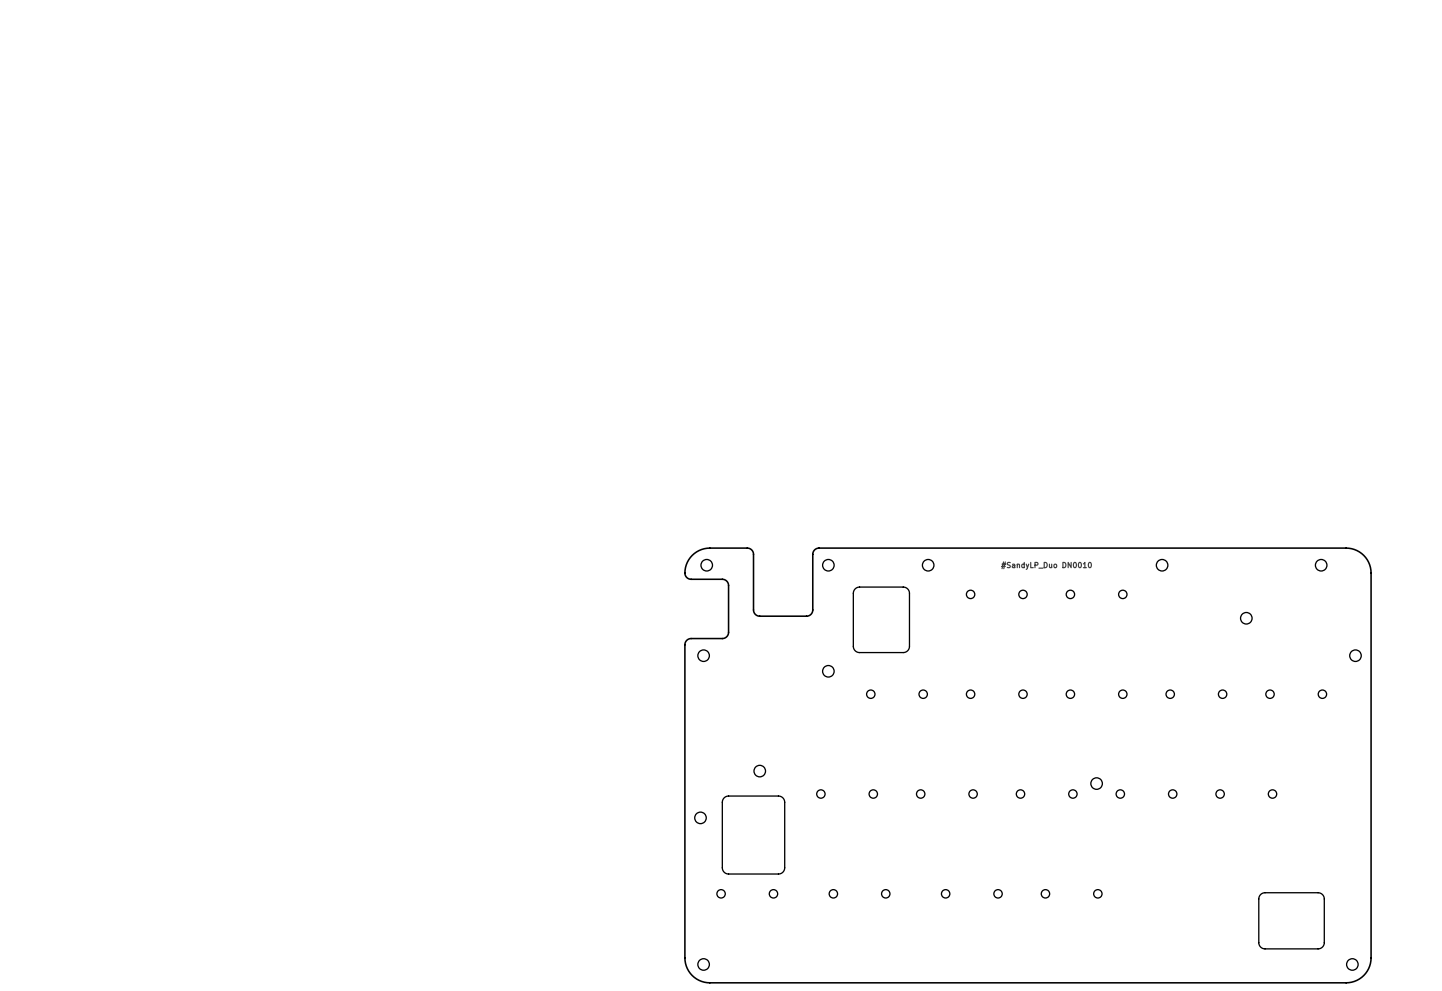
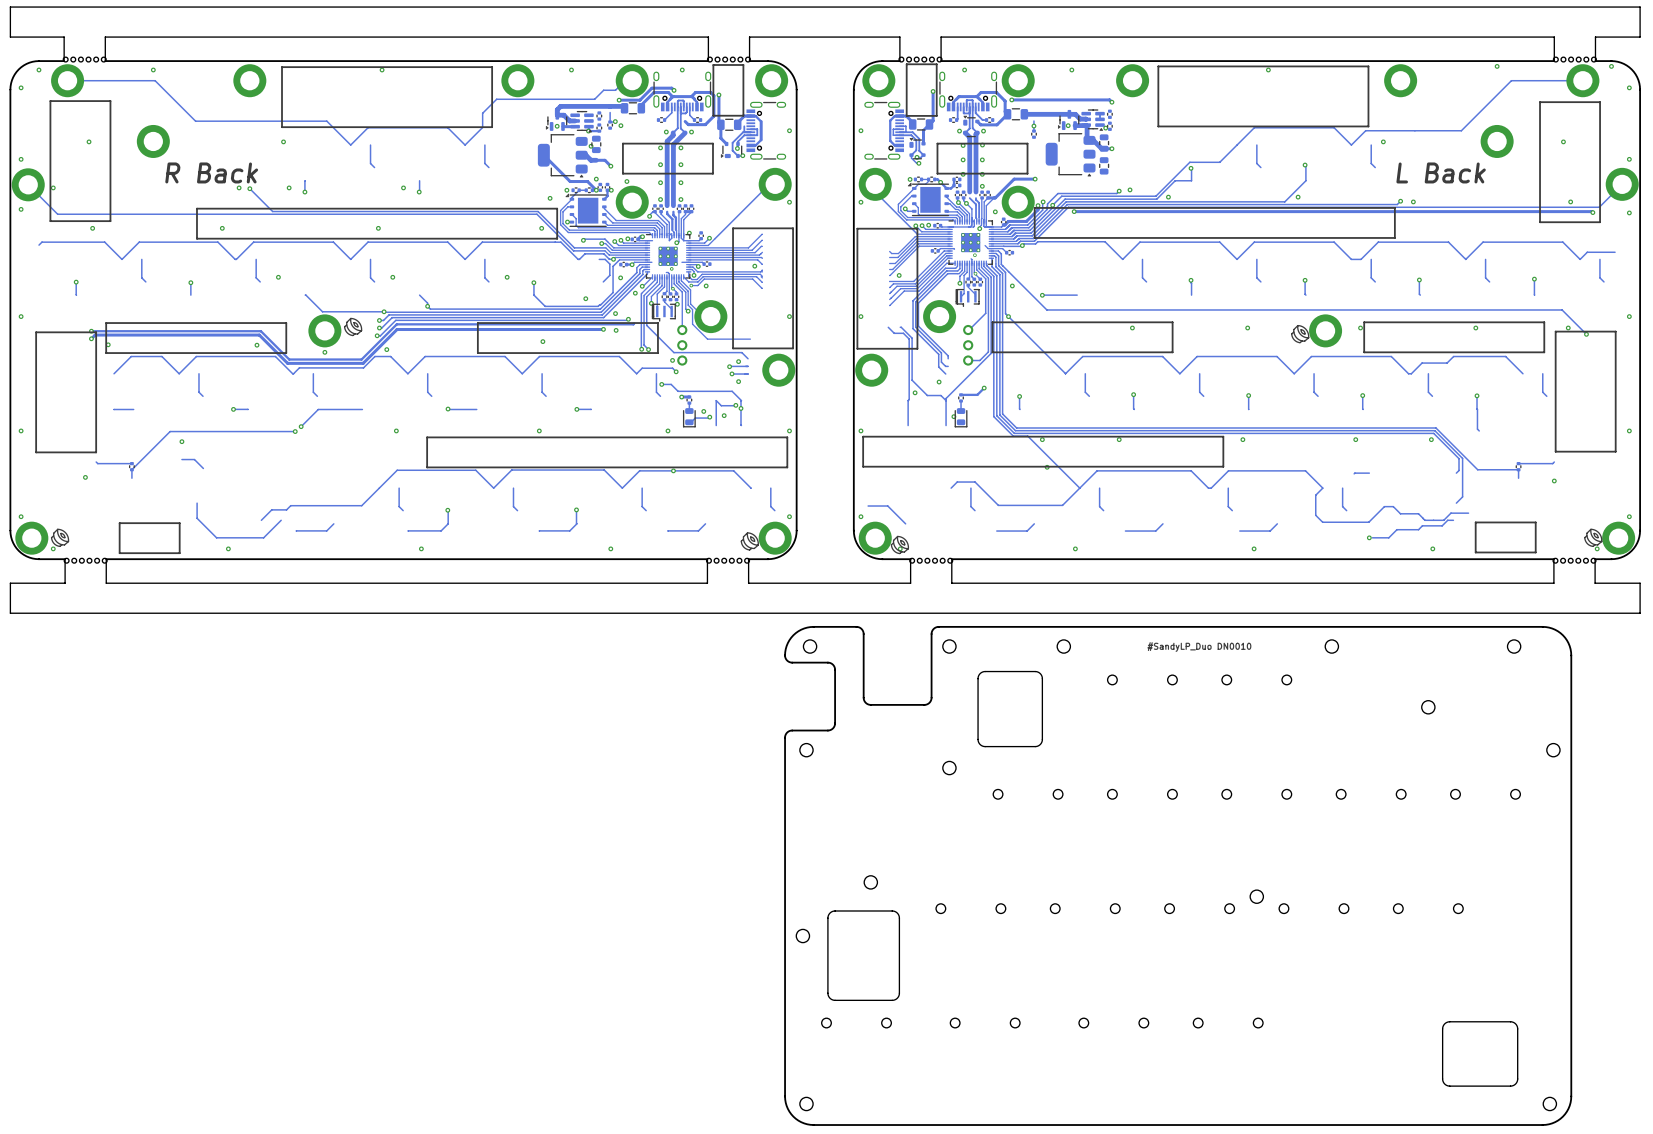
line: none -> (743, 64) (713, 64) (713, 115) (743, 115) (743, 64)
line: none -> (936, 64) (906, 64) (906, 115) (936, 115) (936, 64)
line: none -> (1368, 66) (1158, 66) (1158, 126) (1368, 126) (1368, 66)
via: none -> (1497, 66)
via: none -> (1611, 66)
line: none -> (492, 67) (282, 67) (282, 127) (492, 127) (492, 67)
via: none -> (38, 69)
via: none -> (153, 69)
via: none -> (382, 69)
via: none -> (571, 69)
via: none -> (682, 69)
via: none -> (964, 69)
via: none -> (1071, 69)
via: none -> (1268, 69)
part: none -> (67, 80)
part: none -> (249, 80)
part: none -> (517, 80)
track: none -> (632, 80) (625, 87) (603, 90) (594, 99) (496, 99) (482, 113) (482, 127) (465, 145) (447, 127) (367, 127) (350, 145) (326, 121) (195, 121) (155, 80) (67, 80)
part: none -> (632, 80)
part: none -> (771, 80)
part: none -> (878, 80)
part: none -> (1018, 80)
part: none -> (1132, 80)
part: none -> (1400, 80)
track: none -> (1582, 80) (1511, 80) (1461, 130) (1365, 130) (1351, 145) (1334, 127) (1254, 127) (1219, 162) (1189, 162) (1155, 196) (1061, 196) (1029, 230) (1013, 230) (1010, 234)
part: none -> (1582, 80)
via: none -> (21, 87)
via: none -> (1629, 87)
track: none -> (674, 90) (671, 88) (651, 88) (639, 100) (619, 100)
via: none -> (674, 90)
part: none -> (682, 91)
track: none -> (933, 91) (933, 120) (923, 130) (923, 143)
via: none -> (933, 91)
part: none -> (968, 91)
track: none -> (718, 94) (720, 138) (726, 143)
via: none -> (718, 94)
track: none -> (672, 96) (667, 102) (667, 106)
track: none -> (691, 96) (695, 92) (710, 92) (713, 95) (713, 116) (705, 124) (688, 124) (685, 121)
track: none -> (976, 96) (959, 96) (953, 102) (953, 106)
track: none -> (976, 96) (981, 92) (996, 92) (1005, 101) (1005, 111) (1007, 114) (996, 124) (980, 124) (977, 121)
track: none -> (976, 96) (982, 102) (982, 106)
via: none -> (619, 100)
track: none -> (1011, 99) (1109, 99) (1111, 102)
via: none -> (1011, 99)
line: none -> (110, 101) (50, 101) (50, 221) (110, 221) (110, 101)
via: none -> (1111, 102)
line: none -> (1600, 102) (1540, 102) (1540, 222) (1600, 222) (1600, 102)
track: none -> (671, 106) (671, 112) (664, 120)
track: none -> (680, 106) (680, 128) (685, 132) (673, 144) (673, 205)
track: none -> (683, 106) (683, 101) (678, 100) (677, 128) (667, 141) (667, 205)
track: none -> (686, 106) (686, 112) (680, 113)
track: none -> (689, 106) (689, 115) (694, 120)
track: none -> (696, 106) (696, 102) (692, 96) (672, 96) (668, 92) (653, 92) (641, 105) (641, 108)
track: none -> (957, 106) (956, 120)
track: none -> (963, 106) (963, 113) (969, 113)
track: none -> (966, 106) (966, 100) (972, 100) (972, 128) (977, 132) (975, 192)
track: none -> (969, 106) (969, 128) (965, 132)
track: none -> (975, 106) (975, 113) (982, 120) (986, 120)
track: none -> (624, 108) (622, 106) (560, 106) (557, 109) (557, 115) (563, 115) (569, 120) (575, 120)
part: none -> (632, 108)
track: none -> (610, 112) (610, 122) (615, 121)
part: none -> (1015, 114)
track: none -> (1024, 114) (1075, 114) (1080, 119) (1086, 119)
track: none -> (1100, 113) (1100, 119)
part: none -> (1109, 114)
part: none -> (599, 116)
part: none -> (661, 120)
part: none -> (697, 120)
part: none -> (953, 120)
part: none -> (989, 120)
part: none -> (1068, 119)
part: none -> (1093, 120)
part: none -> (556, 120)
track: none -> (1033, 121) (1033, 126)
part: none -> (582, 121)
via: none -> (615, 121)
part: none -> (729, 124)
track: none -> (737, 124) (744, 116) (755, 116) (761, 121) (761, 139) (755, 145) (750, 145)
track: none -> (912, 124) (906, 116) (894, 116) (890, 120) (890, 140) (894, 145) (899, 145)
part: none -> (921, 124)
part: none -> (610, 125)
via: none -> (620, 125)
via: none -> (1068, 125)
track: none -> (1075, 125) (1086, 125) (1087, 137) (1089, 140) (1093, 140) (1101, 148) (1111, 148)
via: none -> (557, 126)
track: none -> (563, 126) (575, 126)
track: none -> (588, 126) (588, 131) (599, 131)
track: none -> (744, 126) (744, 132)
track: none -> (899, 126) (905, 126) (905, 132) (905, 132) (899, 132) (912, 132) (919, 138) (919, 150) (923, 155) (917, 157)
part: none -> (971, 126)
track: none -> (1033, 126) (1033, 131)
via: none -> (1033, 126)
part: none -> (1109, 126)
part: none -> (599, 128)
via: none -> (1105, 128)
track: none -> (750, 129) (757, 129) (757, 135)
track: none -> (899, 129) (893, 129) (893, 135) (911, 135) (916, 140) (916, 150) (911, 155) (911, 158) (918, 163)
via: none -> (588, 131)
part: none -> (766, 130)
via: none -> (789, 130)
via: none -> (860, 130)
part: none -> (884, 130)
via: none -> (959, 131)
via: none -> (983, 131)
via: none -> (666, 132)
via: none -> (691, 132)
track: none -> (750, 132) (743, 132) (732, 142) (732, 150) (737, 156) (742, 155)
track: none -> (965, 132) (969, 137) (969, 192)
part: none -> (1033, 134)
track: none -> (757, 135) (744, 135) (737, 141) (737, 148)
via: none -> (89, 141)
part: none -> (153, 141)
via: none -> (283, 141)
via: none -> (1383, 141)
part: none -> (1497, 141)
via: none -> (1563, 141)
part: none -> (1104, 143)
line: none -> (712, 143) (622, 143) (622, 173) (712, 173) (712, 143)
line: none -> (1027, 143) (937, 143) (937, 173) (1027, 173) (1027, 143)
track: none -> (370, 145) (370, 163) (374, 167)
track: none -> (484, 145) (484, 163) (488, 167)
part: none -> (596, 144)
via: none -> (963, 145)
via: none -> (982, 145)
track: none -> (1256, 145) (1256, 163) (1260, 167)
track: none -> (1371, 145) (1371, 163) (1375, 167)
via: none -> (591, 146)
via: none -> (660, 147)
via: none -> (680, 147)
via: none -> (737, 148)
part: none -> (917, 148)
via: none -> (1111, 148)
part: none -> (731, 150)
track: none -> (543, 155) (570, 181) (587, 181) (596, 190)
track: none -> (581, 155) (585, 155) (590, 160) (604, 160) (610, 166)
via: none -> (742, 155)
part: none -> (1070, 154)
part: none -> (562, 155)
via: none -> (917, 157)
via: none -> (21, 159)
via: none -> (963, 159)
via: none -> (982, 159)
via: none -> (1629, 159)
via: none -> (918, 163)
via: none -> (660, 164)
via: none -> (680, 164)
part: none -> (1104, 165)
track: none -> (1305, 165) (1305, 180) (1284, 201) (1066, 201) (1032, 235) (1016, 235) (1014, 238)
via: none -> (1305, 165)
via: none -> (610, 166)
track: none -> (1191, 168) (1191, 180) (1175, 180) (1156, 199) (1065, 199) (1031, 233) (1015, 233) (1012, 236)
via: none -> (1191, 168)
text: none -> R Back (211, 172)
text: none -> L Back (1441, 172)
via: none -> (963, 174)
via: none -> (982, 174)
via: none -> (596, 179)
via: none -> (910, 179)
part: none -> (918, 179)
track: none -> (921, 179) (928, 179) (928, 181) (925, 184) (918, 184) (898, 204) (898, 211) (906, 219) (953, 219) (955, 221)
part: none -> (931, 179)
track: none -> (954, 179) (954, 185) (951, 188) (946, 188) (937, 179) (934, 179)
part: none -> (956, 179)
track: none -> (1035, 179) (1014, 179) (995, 197) (988, 197) (984, 201) (983, 226) (1001, 226) (1008, 221) (1026, 221) (1038, 209) (1038, 205)
via: none -> (1035, 179)
track: none -> (305, 180) (304, 192)
track: none -> (419, 180) (419, 192)
via: none -> (626, 181)
via: none -> (660, 182)
via: none -> (680, 182)
via: none -> (940, 182)
track: none -> (775, 184) (769, 184) (708, 245) (688, 245)
part: none -> (775, 184)
track: none -> (875, 184) (875, 192) (917, 234) (950, 234)
part: none -> (875, 184)
track: none -> (1622, 184) (1599, 207) (1068, 207) (1034, 241) (1020, 241) (1018, 243)
part: none -> (1622, 184)
track: none -> (28, 184) (57, 214) (536, 214) (573, 250) (605, 250) (609, 255) (647, 255)
part: none -> (28, 184)
part: none -> (956, 185)
via: none -> (982, 186)
part: none -> (600, 187)
part: none -> (607, 187)
via: none -> (53, 187)
via: none -> (239, 187)
track: none -> (249, 188) (272, 211) (538, 211) (574, 247) (605, 247) (610, 252) (647, 252)
via: none -> (249, 188)
via: none -> (289, 187)
via: none -> (403, 187)
via: none -> (1130, 189)
via: none -> (566, 190)
part: none -> (576, 190)
track: none -> (586, 190) (579, 190) (560, 210) (560, 224) (568, 232) (649, 232) (652, 235)
part: none -> (589, 190)
via: none -> (596, 190)
track: none -> (611, 190) (607, 190) (607, 196) (604, 199)
via: none -> (611, 190)
track: none -> (1119, 191) (1116, 193) (1057, 193) (1047, 204) (1047, 209) (1028, 227) (1011, 227) (1007, 231)
via: none -> (1119, 191)
via: none -> (304, 192)
via: none -> (419, 192)
part: none -> (957, 195)
part: none -> (963, 195)
part: none -> (982, 195)
part: none -> (988, 195)
track: none -> (914, 196) (911, 196) (900, 207) (900, 210) (907, 217) (956, 217) (957, 221)
track: none -> (946, 196) (967, 214) (967, 221)
track: none -> (957, 197) (957, 201) (969, 213) (969, 221)
track: none -> (963, 197) (963, 200) (971, 208) (971, 225) (970, 226)
track: none -> (969, 198) (976, 204) (976, 221)
track: none -> (975, 198) (979, 202) (979, 221)
track: none -> (982, 197) (981, 225) (979, 227)
track: none -> (994, 197) (986, 205) (986, 226)
via: none -> (1168, 197)
via: none -> (1298, 197)
via: none -> (550, 198)
part: none -> (928, 199)
via: none -> (660, 199)
via: none -> (680, 199)
track: none -> (1400, 201) (1397, 204) (1067, 204) (1033, 238) (1019, 238) (1016, 241) (991, 241)
via: none -> (1400, 201)
part: none -> (632, 202)
via: none -> (789, 202)
via: none -> (860, 202)
via: none -> (958, 202)
part: none -> (1018, 202)
track: none -> (1043, 201) (1042, 210) (1027, 225) (1009, 225) (1005, 228)
via: none -> (1043, 201)
via: none -> (1413, 201)
via: none -> (1570, 201)
track: none -> (914, 203) (918, 207) (919, 215) (957, 215) (959, 217) (959, 221)
track: none -> (946, 203) (949, 203) (964, 215) (964, 221)
via: none -> (966, 203)
via: none -> (1038, 205)
via: none -> (1052, 205)
track: none -> (571, 206) (567, 206) (563, 211) (563, 223) (569, 230) (653, 230) (654, 235)
track: none -> (604, 206) (616, 220) (658, 220) (664, 226) (664, 235)
line: none -> (1394, 207) (1034, 207) (1034, 237) (1394, 237) (1394, 207)
via: none -> (21, 209)
line: none -> (557, 208) (196, 208) (196, 238) (557, 238) (557, 208)
part: none -> (654, 208)
part: none -> (661, 208)
part: none -> (679, 208)
part: none -> (685, 208)
part: none -> (691, 208)
track: none -> (905, 208) (907, 211) (914, 211)
via: none -> (905, 208)
part: none -> (586, 210)
track: none -> (661, 211) (661, 214) (669, 222) (669, 240) (671, 238) (671, 235) (669, 233) (669, 233)
track: none -> (667, 211) (672, 219) (674, 235)
track: none -> (673, 211) (675, 217) (676, 235)
track: none -> (679, 211) (678, 242)
track: none -> (946, 211) (957, 211) (962, 216) (962, 221)
via: none -> (995, 211)
track: none -> (1074, 211) (1592, 212)
via: none -> (1074, 211)
via: none -> (1592, 212)
via: none -> (1629, 212)
track: none -> (571, 214) (576, 218) (576, 225) (578, 227) (654, 227) (657, 230) (657, 235)
track: none -> (604, 214) (612, 222) (657, 222) (662, 227) (662, 234)
track: none -> (649, 216) (654, 211) (666, 224) (666, 235)
via: none -> (649, 216)
track: none -> (971, 219) (974, 221) (973, 226) (940, 225)
via: none -> (567, 222)
track: none -> (604, 222) (607, 225) (655, 225) (659, 229) (659, 234)
part: none -> (1003, 222)
track: none -> (922, 225) (925, 229) (950, 229)
via: none -> (922, 225)
via: none -> (928, 225)
part: none -> (937, 225)
track: none -> (915, 225) (921, 231) (950, 231)
via: none -> (915, 225)
track: none -> (1007, 227) (1005, 229) (991, 229)
via: none -> (92, 228)
via: none -> (222, 228)
via: none -> (378, 228)
via: none -> (541, 228)
line: none -> (793, 228) (733, 228) (733, 348) (793, 348) (793, 228)
line: none -> (917, 228) (857, 228) (857, 348) (917, 348) (917, 228)
via: none -> (979, 228)
track: none -> (1009, 229) (1007, 231) (991, 231)
track: none -> (1012, 232) (1010, 234) (991, 234)
via: none -> (689, 233)
track: none -> (762, 234) (748, 247) (688, 247)
track: none -> (1013, 234) (1012, 236) (991, 236)
part: none -> (701, 235)
track: none -> (642, 236) (637, 239) (652, 240)
via: none -> (642, 236)
track: none -> (950, 236) (915, 236) (898, 253) (891, 253) (889, 251)
track: none -> (1016, 236) (1013, 239) (991, 239)
track: none -> (709, 238) (704, 243) (688, 243)
via: none -> (709, 238)
via: none -> (627, 238)
part: none -> (635, 239)
track: none -> (701, 238) (699, 240) (683, 240)
track: none -> (950, 239) (916, 239) (897, 257) (889, 257)
track: none -> (583, 240) (605, 239) (613, 247) (647, 247)
via: none -> (583, 240)
track: none -> (620, 240) (623, 243) (647, 243)
via: none -> (620, 240)
track: none -> (762, 240) (752, 250) (688, 250)
track: none -> (614, 241) (618, 245) (647, 245)
via: none -> (614, 241)
track: none -> (683, 240) (683, 219) (691, 211) (685, 211) (681, 218) (681, 238) (683, 240)
track: none -> (950, 241) (917, 241) (895, 263) (889, 263)
track: none -> (555, 242) (482, 242) (465, 259) (447, 242) (367, 242) (350, 259) (333, 242) (253, 242) (236, 259) (217, 242) (139, 242) (121, 259) (104, 242) (41, 242) (39, 245)
track: none -> (555, 242) (560, 242) (578, 259) (585, 253) (603, 253) (609, 259) (615, 257) (647, 257)
via: none -> (676, 242)
part: none -> (970, 242)
track: none -> (1019, 242) (991, 243)
track: none -> (601, 243) (605, 243) (612, 250) (647, 250)
via: none -> (601, 243)
track: none -> (950, 243) (918, 243) (892, 269) (889, 269)
track: none -> (950, 246) (919, 246) (889, 275)
track: none -> (985, 245) (988, 248) (1002, 248) (1006, 252)
track: none -> (991, 246) (1021, 246) (1024, 243) (1035, 243) (1037, 241) (1105, 241) (1122, 259) (1139, 242) (1219, 242) (1237, 259) (1254, 242) (1334, 242) (1351, 259) (1361, 259) (1378, 242) (1448, 242) (1465, 259)
via: none -> (1022, 245)
track: none -> (762, 246) (755, 252) (688, 252)
track: none -> (954, 249) (940, 248) (938, 250)
part: none -> (935, 250)
track: none -> (950, 251) (944, 251) (913, 281) (889, 281)
track: none -> (991, 251) (998, 251) (1001, 253) (1001, 264) (1046, 309) (1562, 309) (1586, 334)
track: none -> (762, 252) (759, 255) (688, 255)
part: none -> (1009, 252)
track: none -> (1615, 252) (1587, 252) (1580, 259) (1562, 242) (1483, 242) (1465, 259)
track: none -> (950, 253) (945, 253) (915, 283) (893, 283) (889, 287)
track: none -> (991, 253) (996, 253) (998, 255) (998, 265) (1005, 272) (1005, 313) (1065, 373)
via: none -> (974, 255)
part: none -> (668, 256)
track: none -> (950, 255) (946, 255) (916, 286) (897, 286) (889, 293)
track: none -> (991, 255) (995, 257) (995, 266) (1002, 273) (1002, 413) (1016, 427) (1435, 427) (1477, 469) (1518, 469) (1518, 478)
track: none -> (688, 257) (762, 258)
track: none -> (950, 258) (947, 258) (917, 288) (900, 288) (889, 299)
track: none -> (971, 258) (971, 276) (974, 279)
track: none -> (991, 258) (992, 266) (999, 274) (999, 415) (1015, 430) (1434, 430) (1462, 458) (1462, 496) (1456, 503)
track: none -> (141, 259) (141, 277) (145, 281)
track: none -> (256, 259) (256, 277) (260, 281)
track: none -> (370, 259) (370, 277) (374, 281)
track: none -> (484, 259) (484, 277) (488, 281)
track: none -> (599, 259) (605, 259) (609, 264) (609, 275) (603, 281)
via: none -> (613, 259)
track: none -> (647, 259) (619, 259) (613, 266) (613, 292) (598, 306) (545, 306) (533, 295) (533, 282)
track: none -> (688, 259) (757, 259) (762, 264)
track: none -> (1142, 259) (1142, 277) (1146, 281)
track: none -> (1256, 259) (1256, 277) (1260, 281)
track: none -> (1371, 259) (1371, 277) (1375, 281)
track: none -> (1485, 259) (1485, 277) (1489, 281)
track: none -> (1599, 259) (1599, 277) (1603, 281)
track: none -> (651, 262) (634, 262) (632, 264) (626, 264)
track: none -> (681, 262) (702, 262) (704, 264)
track: none -> (955, 263) (946, 263) (919, 291) (904, 291) (889, 305)
track: none -> (957, 263) (955, 268) (945, 268) (913, 300) (913, 328) (938, 354) (938, 366) (945, 374)
track: none -> (959, 263) (959, 268) (957, 270) (946, 270) (915, 301) (915, 327) (941, 352) (941, 362) (948, 366)
track: none -> (962, 263) (962, 270) (959, 273) (947, 273) (918, 303) (918, 326) (948, 355) (948, 358)
track: none -> (964, 263) (964, 271) (959, 276) (959, 283)
track: none -> (967, 263) (967, 272) (964, 275) (964, 293) (961, 296)
track: none -> (969, 263) (968, 279)
track: none -> (974, 263) (974, 272) (980, 279)
track: none -> (976, 263) (976, 269) (985, 278) (985, 313) (968, 330)
track: none -> (979, 263) (979, 268) (988, 278) (988, 351) (979, 360) (968, 360)
track: none -> (981, 263) (981, 267) (991, 277) (991, 353) (946, 398) (946, 425)
track: none -> (983, 263) (983, 266) (993, 276) (993, 416) (1013, 436) (1027, 436) (1079, 488)
track: none -> (986, 263) (996, 275) (996, 415) (1014, 433) (1433, 433) (1459, 458) (1459, 470) (1456, 473)
part: none -> (623, 264)
part: none -> (707, 264)
via: none -> (632, 264)
track: none -> (647, 264) (639, 264) (636, 267) (636, 272) (600, 309) (430, 309) (419, 295)
track: none -> (688, 264) (698, 266)
via: none -> (698, 266)
via: none -> (754, 266)
track: none -> (647, 267) (642, 267) (639, 273) (601, 312) (322, 311) (305, 295)
track: none -> (688, 267) (692, 267) (697, 271) (760, 271) (762, 270)
via: none -> (671, 268)
track: none -> (647, 269) (642, 270) (642, 274) (602, 314) (389, 314) (383, 320) (379, 320)
track: none -> (688, 269) (694, 271) (694, 275)
track: none -> (647, 271) (603, 317) (392, 317) (381, 328) (379, 328)
track: none -> (666, 272) (669, 273) (670, 293)
track: none -> (688, 271) (688, 276) (691, 279) (696, 279) (702, 274) (760, 274) (762, 276)
track: none -> (762, 271) (762, 271)
via: none -> (975, 273)
via: none -> (694, 275)
via: none -> (899, 275)
via: none -> (278, 277)
via: none -> (392, 277)
via: none -> (507, 277)
track: none -> (652, 276) (642, 286)
track: none -> (654, 276) (654, 280) (641, 293)
track: none -> (657, 276) (657, 282) (644, 295) (644, 345) (648, 349)
track: none -> (659, 276) (659, 283) (646, 296) (646, 325) (673, 352) (741, 352) (748, 358)
track: none -> (662, 276) (662, 285) (651, 296) (651, 303)
track: none -> (664, 276) (664, 286) (657, 294) (657, 311)
track: none -> (666, 276) (666, 291) (664, 293)
track: none -> (671, 276) (672, 288)
track: none -> (674, 276) (674, 283) (682, 292) (682, 330)
track: none -> (676, 276) (676, 282) (685, 292) (685, 309) (688, 311)
track: none -> (678, 276) (678, 281) (688, 291) (688, 305) (692, 309) (692, 324) (707, 339) (750, 339)
track: none -> (681, 276) (681, 280) (690, 289) (690, 303) (703, 316) (710, 316)
track: none -> (683, 276) (688, 281) (697, 281) (703, 276) (756, 276) (762, 282)
track: none -> (761, 276) (762, 277)
via: none -> (620, 277)
track: none -> (1534, 279) (1534, 295)
via: none -> (1534, 279)
track: none -> (1191, 280) (1191, 295)
via: none -> (1191, 280)
track: none -> (1305, 280) (1305, 295)
via: none -> (1305, 280)
track: none -> (1419, 279) (1420, 295)
via: none -> (1419, 279)
track: none -> (76, 282) (76, 295)
via: none -> (76, 282)
track: none -> (190, 282) (190, 295)
via: none -> (190, 282)
via: none -> (533, 282)
part: none -> (968, 282)
part: none -> (974, 282)
part: none -> (980, 282)
via: none -> (959, 283)
track: none -> (968, 285) (975, 296)
via: none -> (642, 286)
track: none -> (691, 285) (697, 285) (704, 279) (752, 279) (762, 288)
via: none -> (691, 285)
via: none -> (706, 285)
via: none -> (1012, 285)
track: none -> (673, 288) (676, 293)
via: none -> (672, 288)
via: none -> (635, 293)
track: none -> (641, 293) (641, 349)
via: none -> (1042, 295)
track: none -> (1077, 295) (1042, 295)
part: none -> (664, 296)
part: none -> (670, 296)
part: none -> (676, 296)
via: none -> (585, 298)
part: none -> (967, 297)
track: none -> (664, 299) (671, 311)
via: none -> (651, 303)
via: none -> (677, 304)
via: none -> (427, 306)
part: none -> (825, 310)
via: none -> (688, 311)
via: none -> (384, 311)
part: none -> (663, 312)
via: none -> (615, 313)
via: none -> (21, 316)
part: none -> (710, 316)
via: none -> (789, 316)
via: none -> (860, 316)
part: none -> (939, 316)
via: none -> (1008, 316)
via: none -> (1629, 316)
drawing: none -> [344, 317, 363, 336]
track: none -> (628, 319) (395, 320) (380, 335) (377, 335)
via: none -> (628, 319)
via: none -> (379, 320)
line: none -> (286, 323) (106, 323) (106, 353) (286, 353) (286, 323)
line: none -> (657, 323) (477, 323) (477, 353) (657, 353) (657, 323)
line: none -> (1172, 322) (992, 322) (992, 352) (1172, 352) (1172, 322)
line: none -> (1544, 322) (1364, 322) (1364, 352) (1544, 352) (1544, 322)
track: none -> (634, 323) (396, 324) (361, 359) (289, 359) (260, 331) (91, 331)
drawing: none -> [1291, 325, 1310, 344]
track: none -> (888, 327) (894, 333) (903, 333) (909, 339) (908, 425)
track: none -> (900, 327) (912, 338) (912, 380) (927, 395) (940, 395) (946, 400)
via: none -> (379, 328)
via: none -> (1132, 328)
via: none -> (1247, 328)
via: none -> (1360, 328)
via: none -> (1475, 328)
via: none -> (1568, 328)
track: none -> (603, 329) (397, 329) (363, 363) (287, 363) (259, 335) (95, 335) (91, 338)
via: none -> (603, 329)
part: none -> (324, 330)
via: none -> (616, 330)
part: none -> (1325, 330)
via: none -> (91, 331)
line: none -> (1615, 331) (1555, 331) (1555, 451) (1615, 451) (1615, 331)
line: none -> (96, 332) (36, 332) (36, 452) (96, 452) (96, 332)
via: none -> (1586, 334)
via: none -> (377, 335)
via: none -> (91, 338)
via: none -> (542, 341)
via: none -> (108, 344)
via: none -> (256, 345)
part: none -> (682, 345)
part: none -> (968, 345)
via: none -> (641, 349)
via: none -> (386, 349)
via: none -> (648, 349)
via: none -> (324, 352)
via: none -> (672, 360)
via: none -> (738, 361)
track: none -> (748, 366) (729, 366)
via: none -> (729, 366)
part: none -> (778, 370)
part: none -> (871, 370)
track: none -> (676, 371) (672, 368) (642, 368) (636, 373) (619, 356) (539, 356) (522, 373) (505, 356) (425, 356) (407, 373) (390, 356) (374, 356) (363, 367) (299, 367) (292, 373) (275, 356) (196, 356) (179, 373) (161, 356) (131, 356) (114, 373)
via: none -> (676, 371)
track: none -> (198, 373) (198, 392) (203, 396)
track: none -> (313, 373) (313, 392) (317, 396)
track: none -> (427, 373) (427, 392) (431, 396)
track: none -> (542, 373) (542, 392) (546, 396)
track: none -> (656, 373) (656, 392) (660, 396)
track: none -> (731, 373) (748, 374)
via: none -> (731, 373)
track: none -> (1085, 373) (1085, 392) (1089, 396)
track: none -> (1199, 373) (1199, 392) (1203, 396)
track: none -> (1314, 373) (1314, 392) (1318, 396)
track: none -> (1428, 373) (1428, 392) (1432, 396)
track: none -> (1522, 373) (1505, 356) (1453, 356) (1447, 363) (1422, 363) (1411, 373) (1408, 373) (1391, 356) (1311, 356) (1294, 373) (1276, 356) (1197, 356) (1179, 373) (1162, 356) (1082, 356) (1065, 373)
track: none -> (1542, 373) (1542, 392) (1546, 396)
via: none -> (738, 381)
via: none -> (939, 382)
track: none -> (661, 384) (671, 384) (678, 391) (732, 391) (741, 400) (741, 425)
via: none -> (661, 384)
track: none -> (984, 388) (977, 394) (961, 394)
via: none -> (984, 388)
via: none -> (915, 392)
track: none -> (1133, 394) (1134, 409)
via: none -> (1133, 394)
track: none -> (1248, 395) (1248, 409)
via: none -> (1248, 395)
track: none -> (1362, 395) (1363, 409)
via: none -> (1362, 395)
track: none -> (1477, 395) (1477, 429) (1479, 430)
via: none -> (1477, 395)
via: none -> (681, 397)
track: none -> (689, 396) (681, 396)
track: none -> (1019, 396) (1020, 409)
via: none -> (1019, 396)
part: none -> (961, 397)
part: none -> (689, 400)
track: none -> (961, 401) (961, 411)
track: none -> (689, 403) (689, 411)
track: none -> (735, 405) (721, 405) (716, 400) (716, 425)
via: none -> (735, 405)
track: none -> (448, 409) (476, 409)
via: none -> (448, 409)
via: none -> (741, 408)
track: none -> (133, 409) (114, 409)
track: none -> (233, 409) (248, 409)
via: none -> (233, 409)
track: none -> (362, 409) (318, 409) (301, 426)
track: none -> (576, 409) (591, 409)
via: none -> (576, 409)
via: none -> (703, 411)
via: none -> (724, 415)
via: none -> (953, 416)
part: none -> (689, 417)
track: none -> (709, 417) (695, 418) (689, 422)
via: none -> (709, 417)
part: none -> (961, 417)
via: none -> (301, 426)
via: none -> (21, 430)
track: none -> (295, 431) (170, 431) (131, 469) (131, 478)
via: none -> (295, 431)
via: none -> (396, 430)
via: none -> (539, 430)
via: none -> (667, 430)
via: none -> (789, 430)
via: none -> (860, 430)
via: none -> (1629, 430)
line: none -> (787, 437) (427, 437) (427, 467) (787, 467) (787, 437)
line: none -> (1223, 436) (863, 436) (863, 466) (1223, 466) (1223, 436)
via: none -> (1042, 439)
via: none -> (1119, 439)
via: none -> (1242, 439)
via: none -> (1355, 439)
via: none -> (1431, 439)
via: none -> (181, 441)
track: none -> (181, 459) (194, 459) (203, 468)
track: none -> (96, 462) (97, 463) (131, 463)
track: none -> (1554, 462) (1552, 463) (1518, 463)
part: none -> (131, 466)
via: none -> (1047, 467)
part: none -> (1518, 466)
via: none -> (673, 470)
track: none -> (1369, 473) (1354, 473)
via: none -> (85, 477)
via: none -> (1554, 480)
track: none -> (399, 488) (399, 506) (403, 510)
track: none -> (513, 488) (513, 506) (517, 510)
track: none -> (642, 488) (642, 506) (646, 510)
track: none -> (751, 488) (733, 470) (639, 470) (622, 488) (604, 470) (511, 470) (493, 488) (475, 470) (397, 470) (361, 505) (290, 505) (286, 509) (271, 509) (261, 520)
track: none -> (770, 488) (770, 506) (774, 510)
track: none -> (951, 488) (957, 482) (975, 482) (998, 505) (1062, 505) (1097, 470) (1191, 470) (1208, 488) (1211, 488) (1228, 470) (1305, 470) (1322, 488) (1315, 495) (1315, 515) (1322, 522) (1368, 522) (1384, 506) (1393, 506) (1400, 513) (1418, 513) (1423, 518)
track: none -> (970, 488) (970, 506) (974, 510)
track: none -> (1099, 488) (1099, 506) (1103, 510)
track: none -> (1228, 488) (1228, 506) (1232, 510)
track: none -> (1342, 488) (1342, 506) (1346, 510)
track: none -> (197, 503) (197, 518) (216, 537) (263, 537) (281, 520)
track: none -> (868, 506) (887, 506) (905, 523)
track: none -> (447, 510) (448, 523) (441, 530) (408, 531)
via: none -> (447, 510)
track: none -> (576, 509) (576, 523) (569, 530) (539, 531)
via: none -> (576, 509)
track: none -> (1468, 513) (1450, 513) (1443, 520) (1424, 520) (1423, 518)
via: none -> (21, 516)
via: none -> (789, 516)
via: none -> (860, 516)
via: none -> (1629, 516)
track: none -> (1453, 520) (1447, 520) (1442, 525) (1422, 525) (1418, 529) (1396, 529) (1388, 537) (1372, 537)
line: none -> (1535, 522) (1475, 522) (1475, 552) (1535, 552) (1535, 522)
line: none -> (179, 523) (119, 523) (119, 553) (179, 553) (179, 523)
track: none -> (333, 523) (326, 530) (296, 531)
track: none -> (705, 523) (698, 530) (668, 531)
track: none -> (1034, 523) (1027, 531) (996, 531)
track: none -> (1162, 523) (1155, 531) (1125, 531)
track: none -> (1277, 523) (1270, 531) (1239, 531)
drawing: none -> [51, 528, 69, 547]
drawing: none -> [1584, 528, 1603, 547]
drawing: none -> [740, 532, 759, 551]
drawing: none -> [891, 536, 909, 554]
part: none -> (31, 538)
part: none -> (775, 538)
part: none -> (875, 538)
via: none -> (1369, 537)
part: none -> (1618, 538)
via: none -> (53, 548)
via: none -> (228, 548)
via: none -> (421, 548)
via: none -> (610, 548)
via: none -> (900, 548)
via: none -> (1075, 548)
via: none -> (1254, 548)
via: none -> (1432, 548)
via: none -> (1597, 548)

